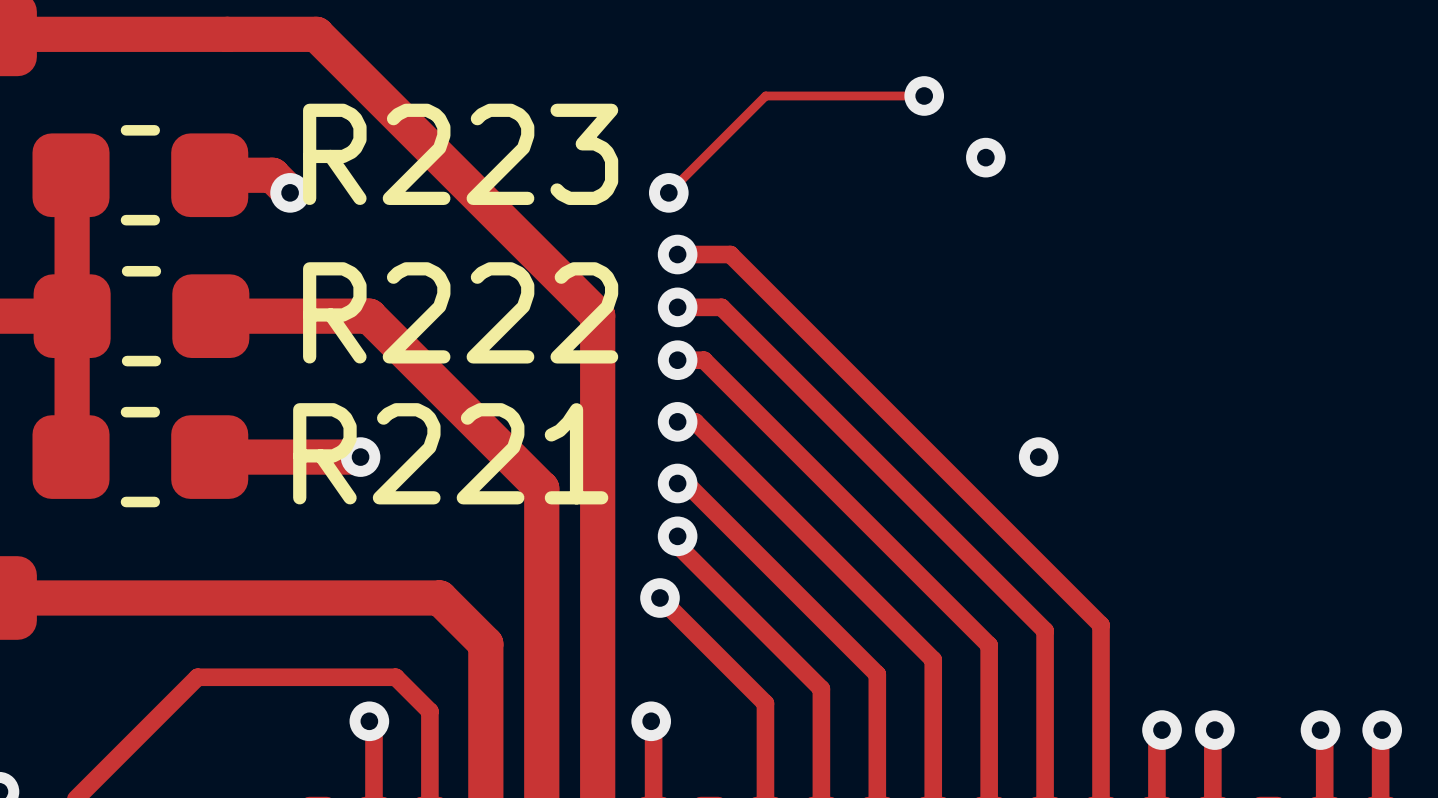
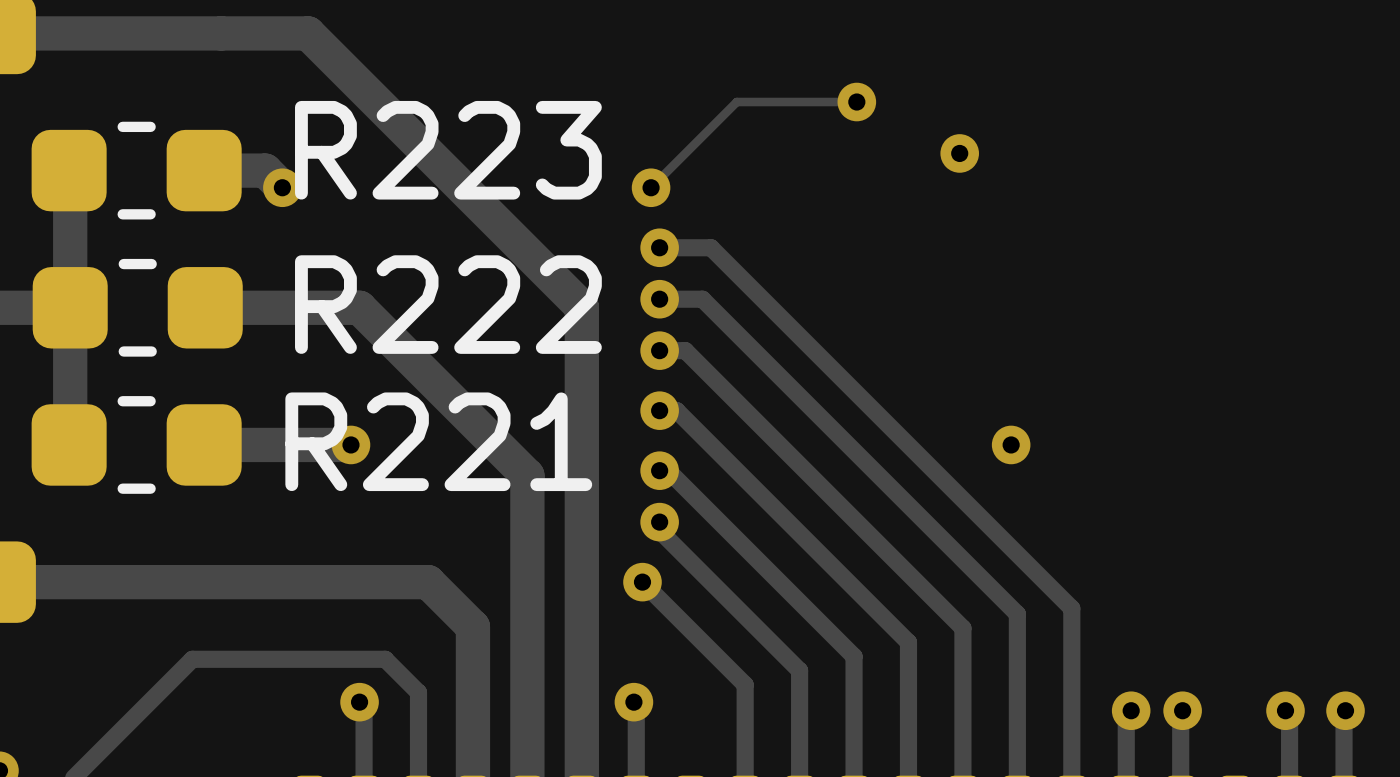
track: (924, 95) (765, 95) (756, 104) -> (856, 102) (736, 102)
via position: (924, 95) -> (856, 102)

